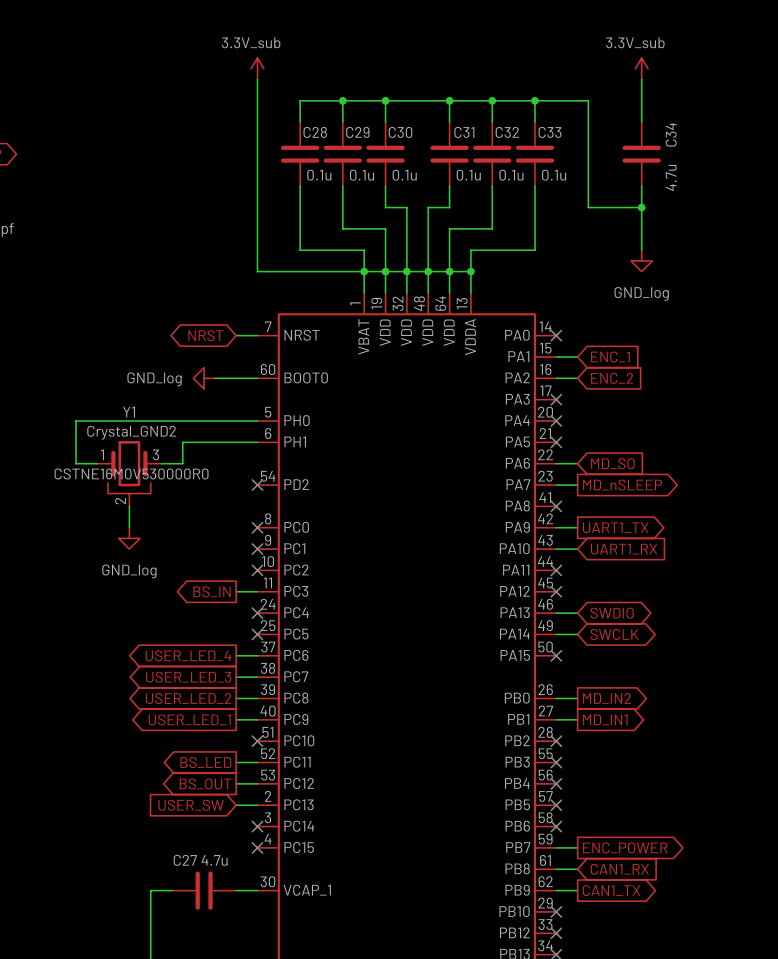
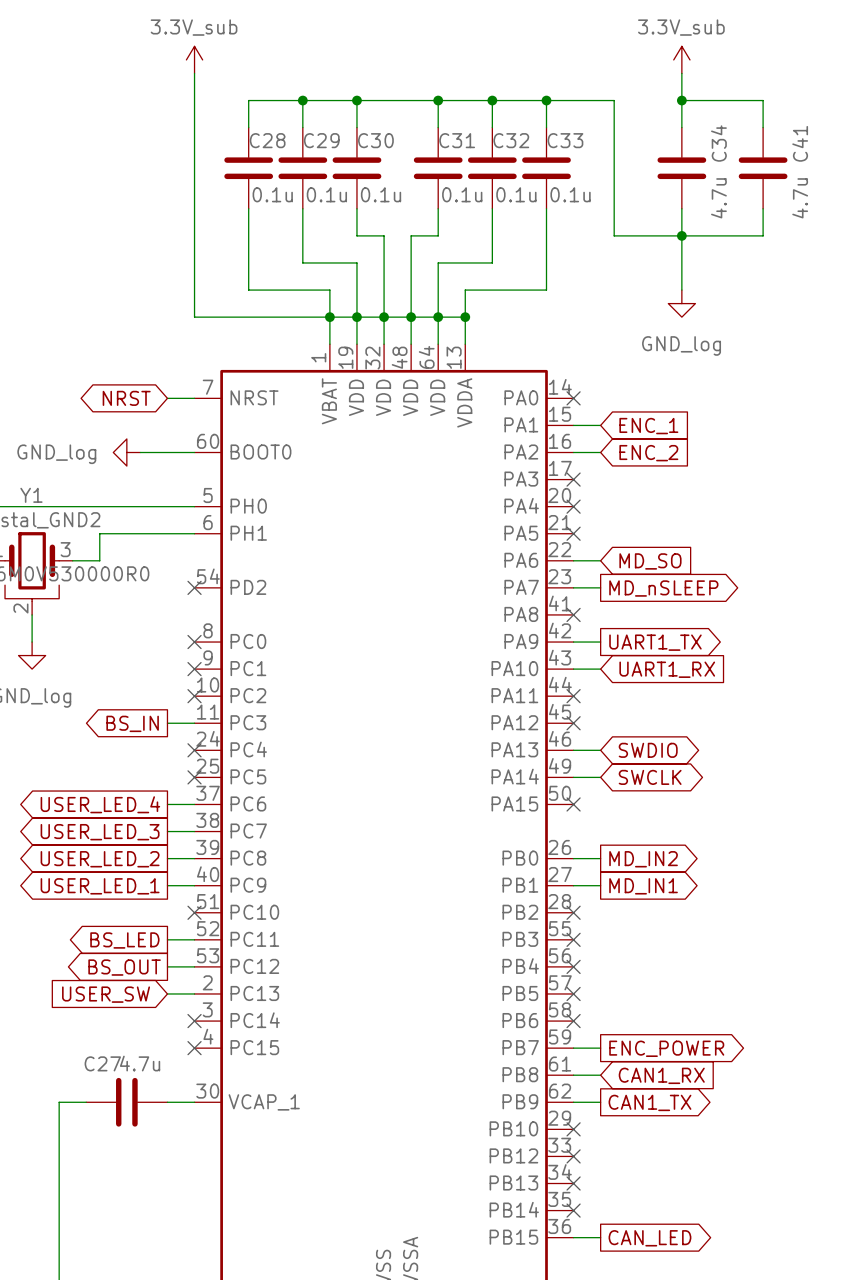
wire: none -> (681, 100) (763, 100) (763, 127)
junction: none -> (681, 100)
C41: none -> 4.7u (763, 168)
wire: none -> (763, 208) (763, 235) (681, 235)

